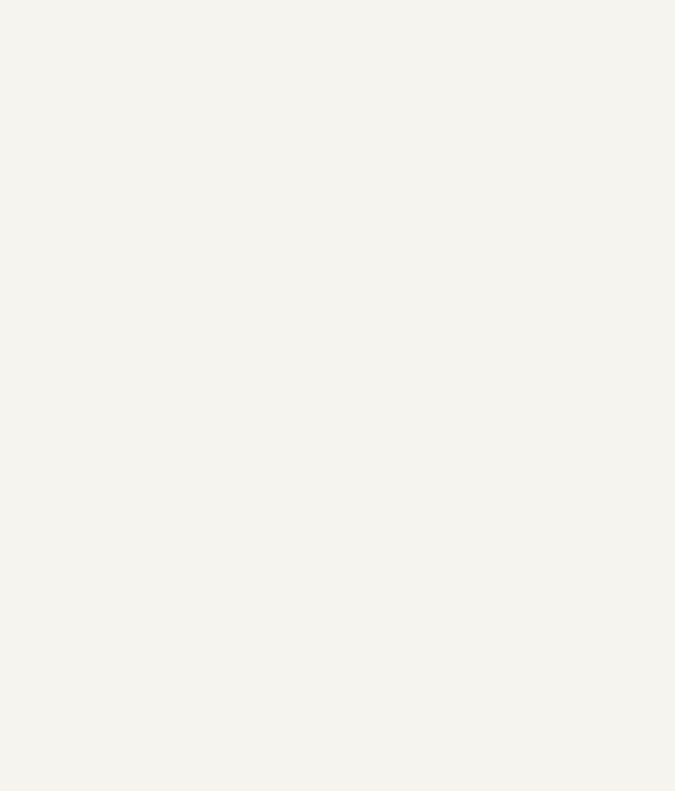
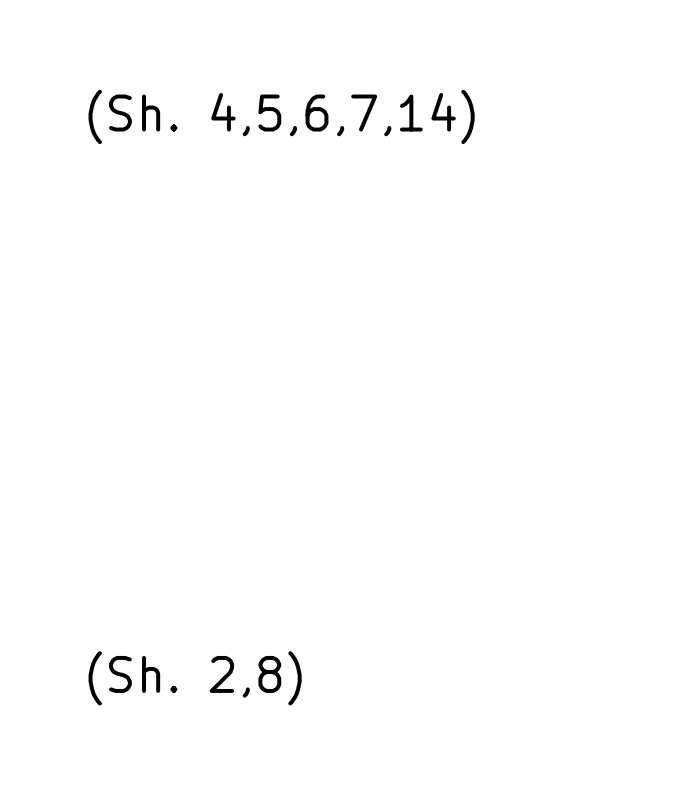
text: none -> (Sh. 4,5,6,7,14) (281, 116)
text: none -> (Sh. 2,8) (195, 678)

